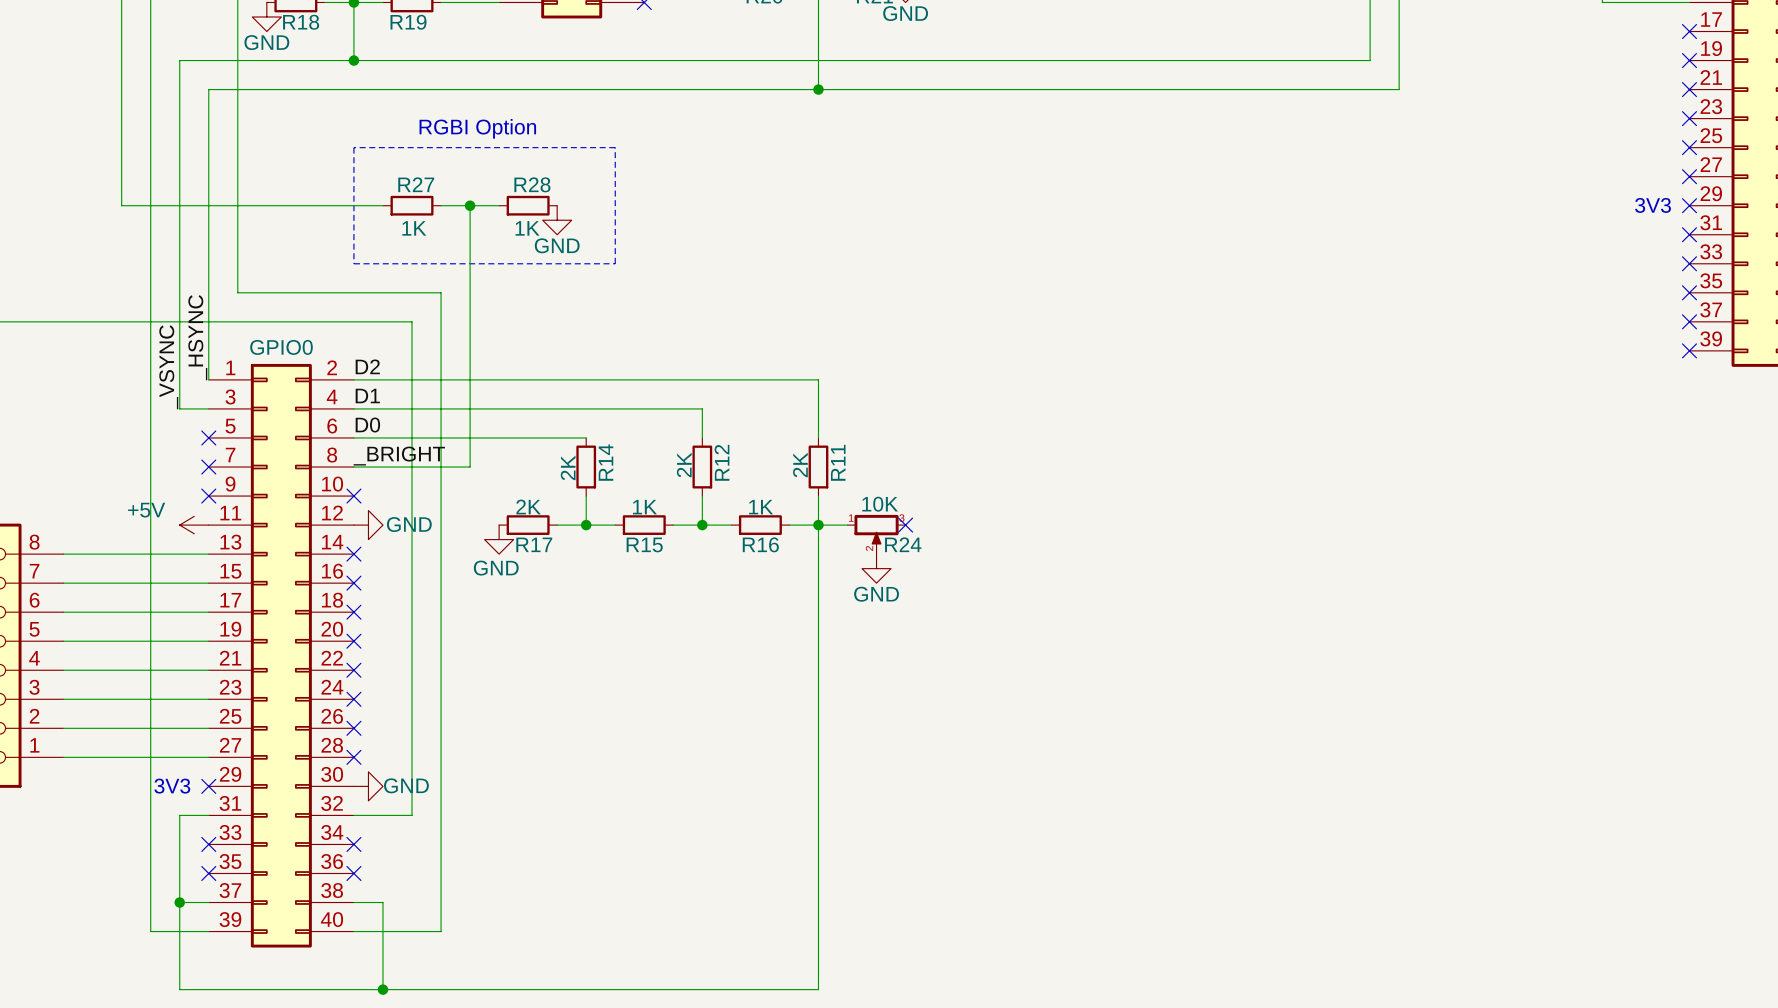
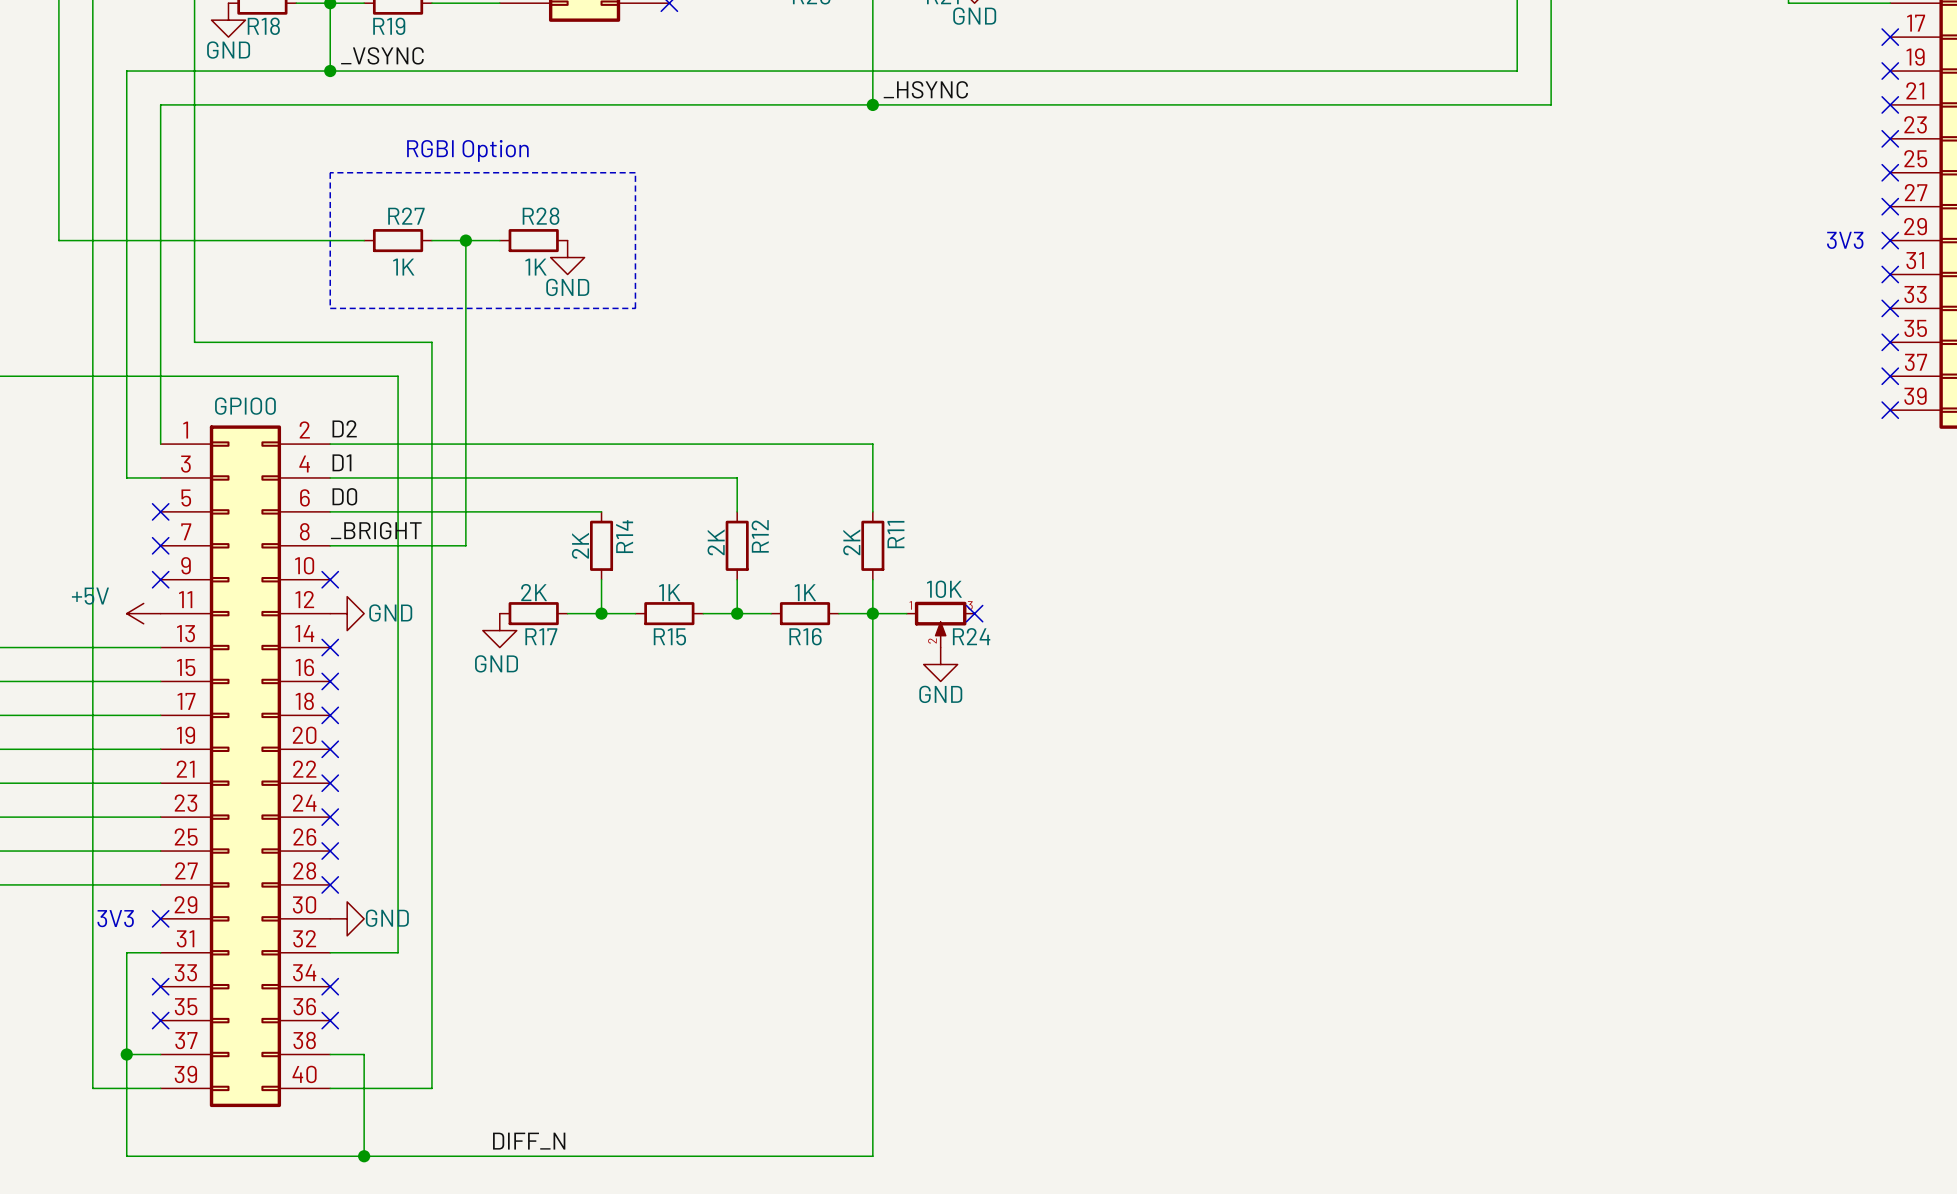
label: none -> _VSYNC (382, 55)
label: none -> _HSYNC (925, 89)
label: _HSYNC (197, 337) -> none
label: _VSYNC (168, 367) -> none
label: none -> DIFF_N (529, 1141)

